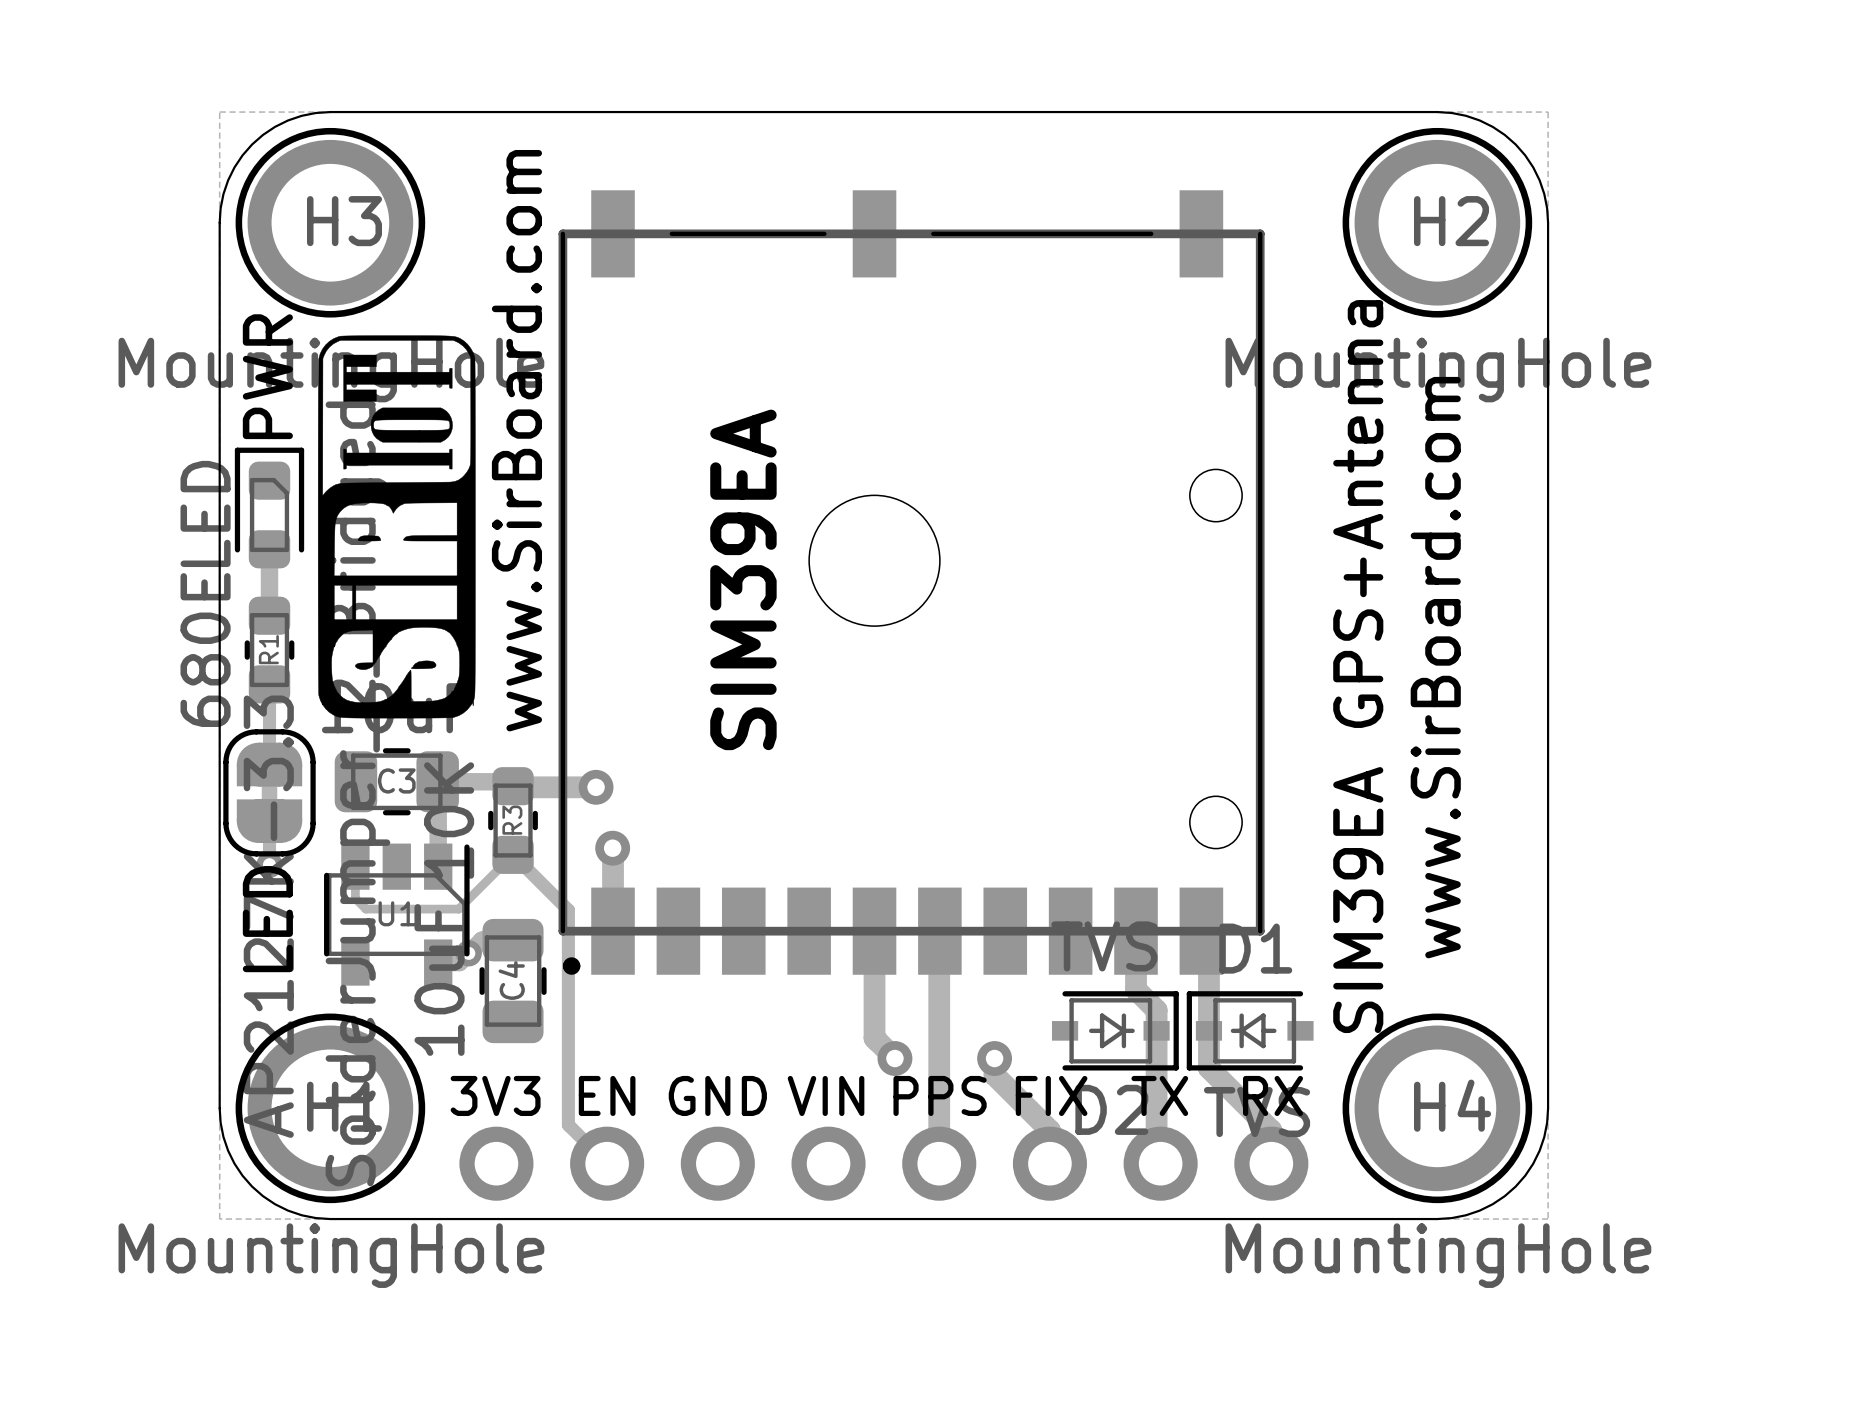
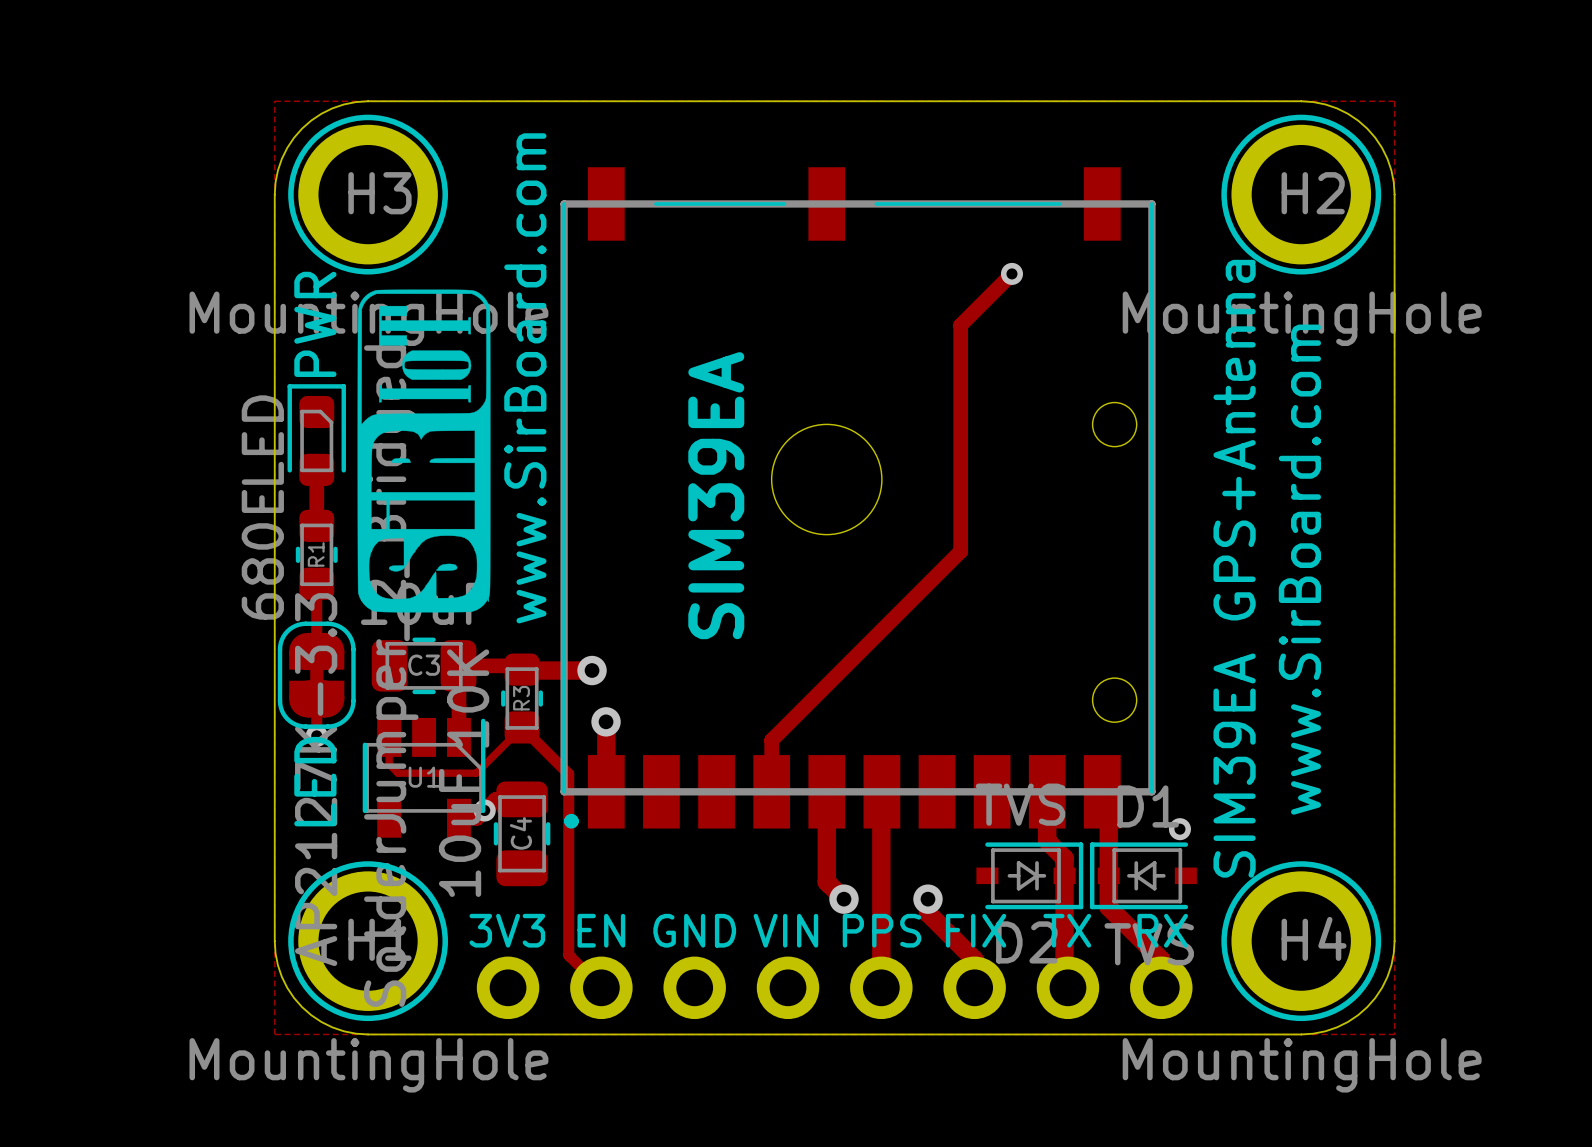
track: none -> (1011, 273) (960, 325) (960, 551) (771, 740) (771, 791)
via: none -> (1011, 273)
via: none -> (1179, 829)

